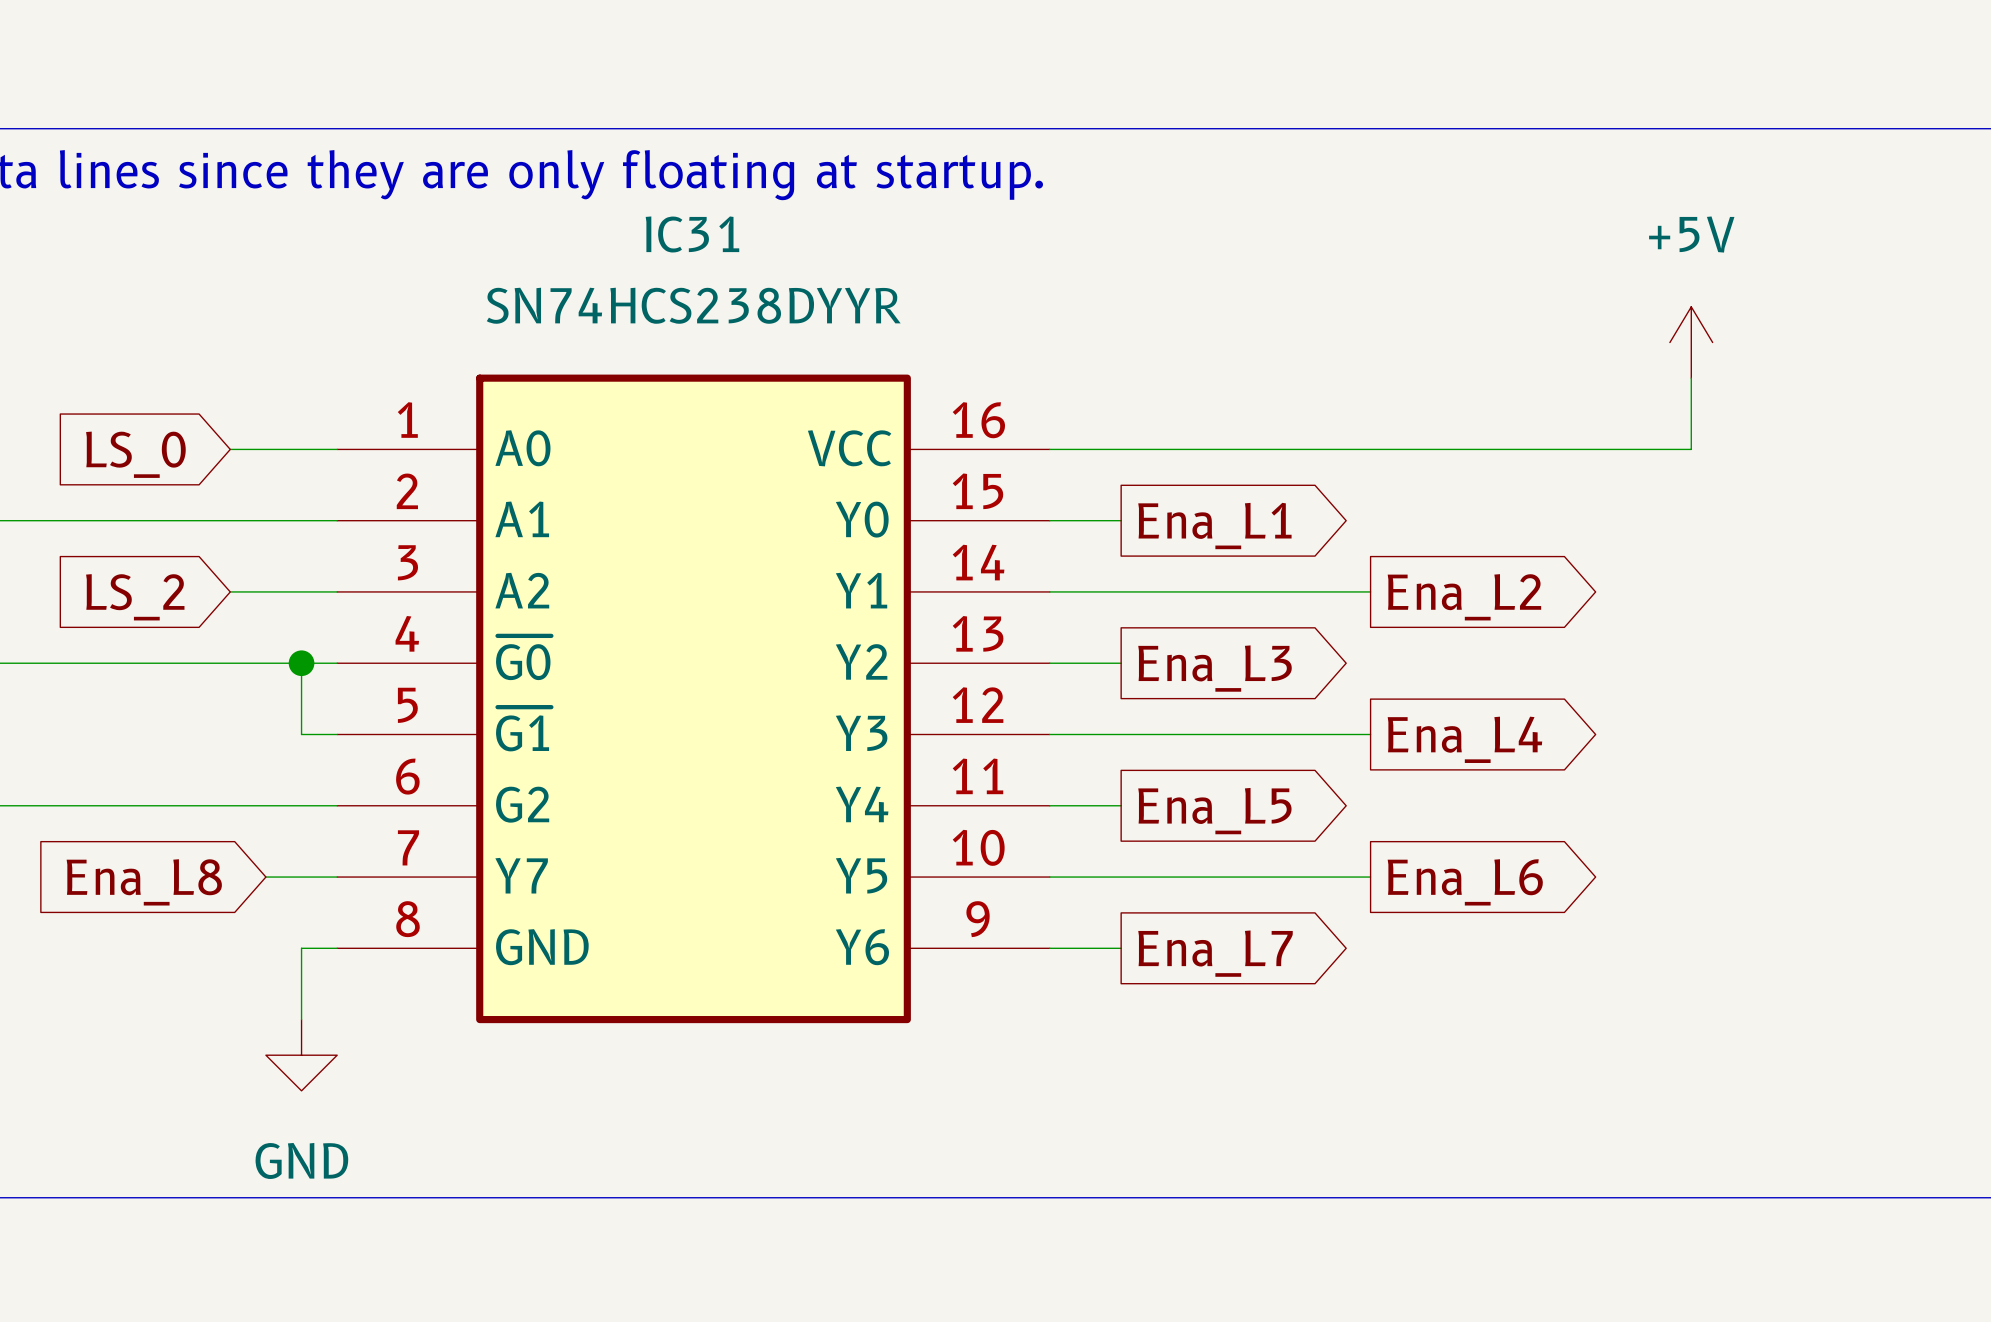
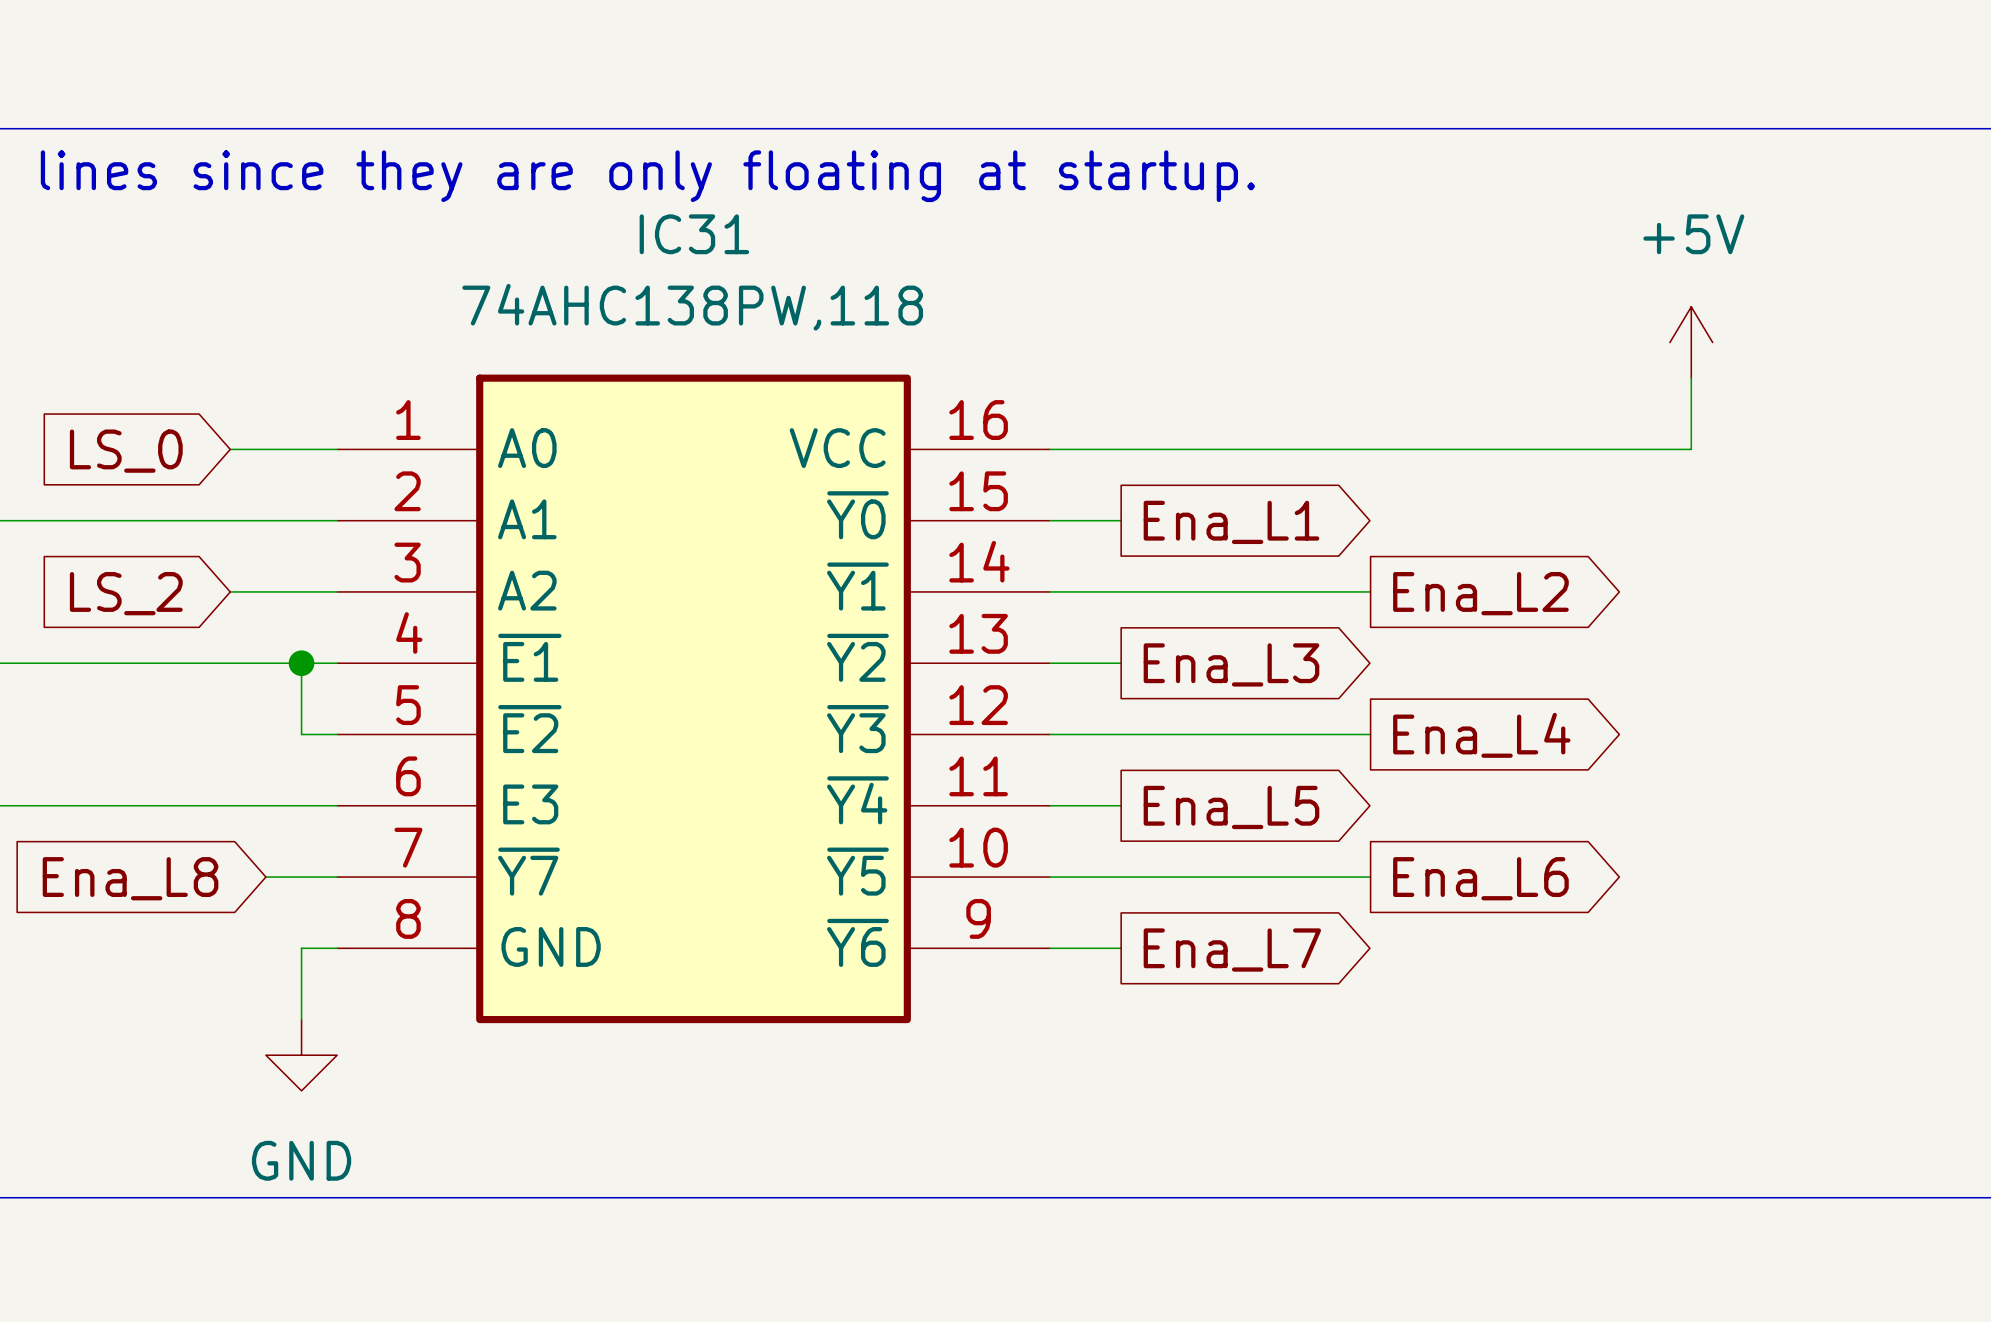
IC31 value: SN74HCS238DYYR (693, 305) -> 74AHC138PW,118 (692, 307)
IC31 symbol: [337, 374, 1050, 1024] -> [337, 374, 1050, 1024]

